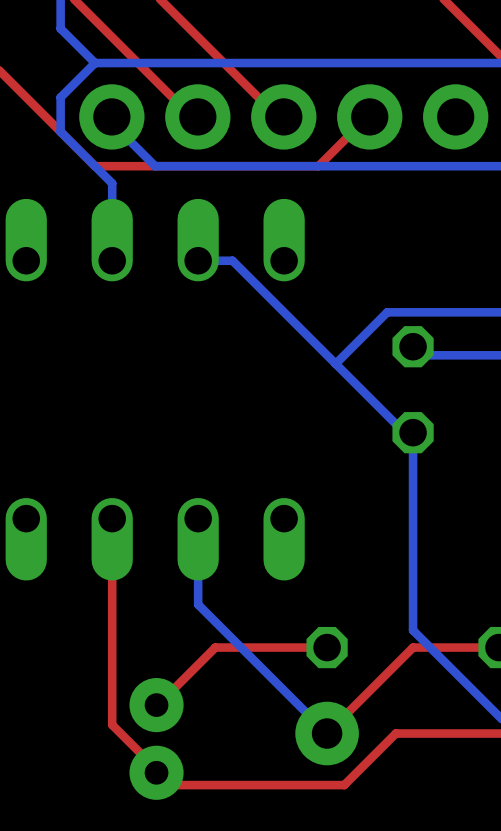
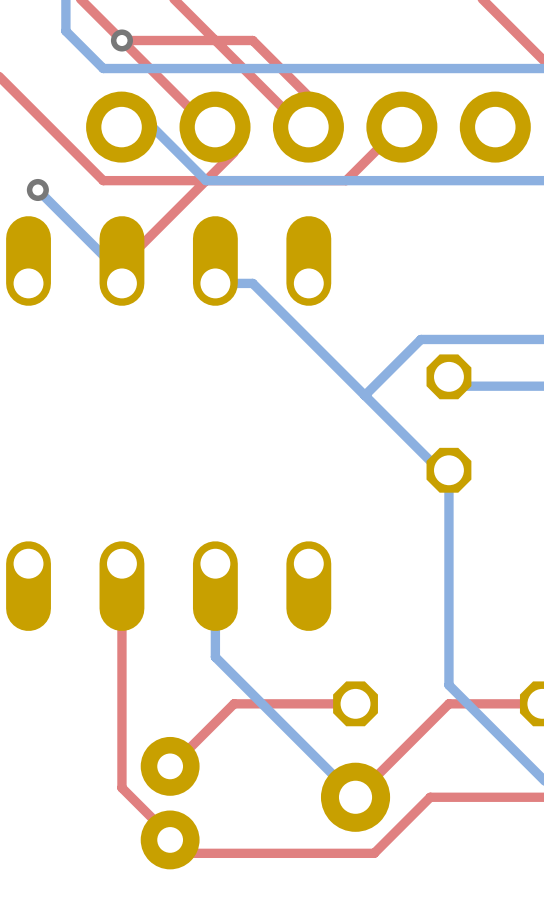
top track: none -> (121, 40) (252, 40) (308, 96)
via: none -> (121, 40)
bottom track: (95, 63) (60, 97) (60, 131) (112, 183) (112, 252) -> (37, 189) (121, 274)
bottom track: (111, 116) (112, 123) (155, 166) (189, 166) -> (121, 96) (206, 180)
top track: none -> (234, 152) (121, 264) (121, 283)
via: none -> (37, 189)

